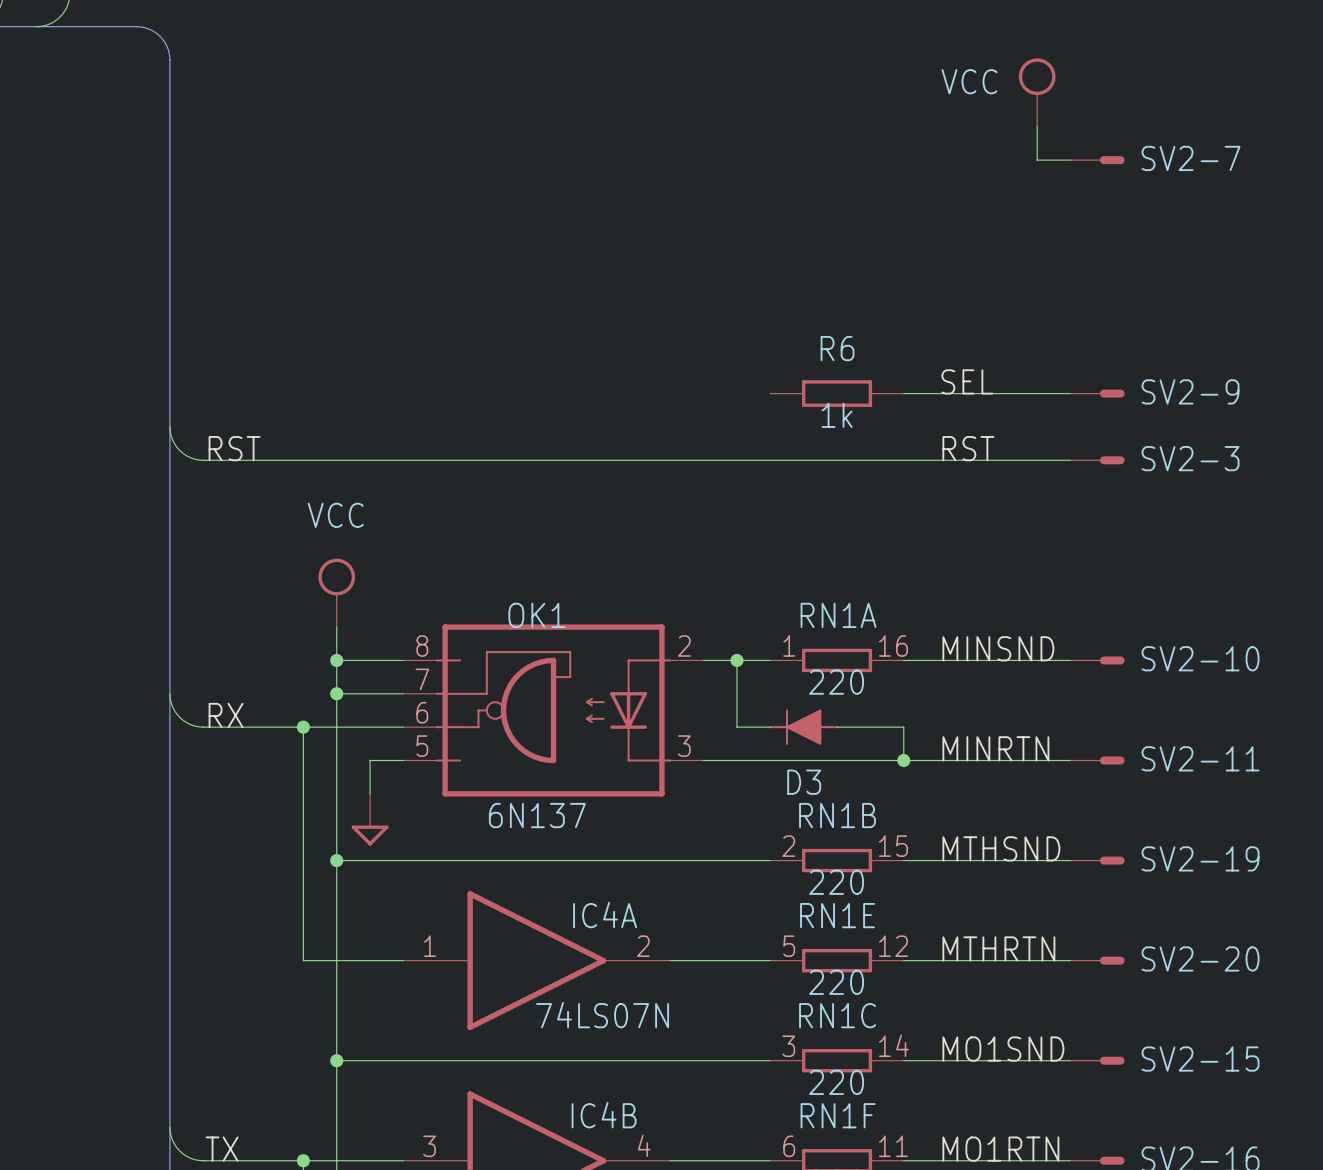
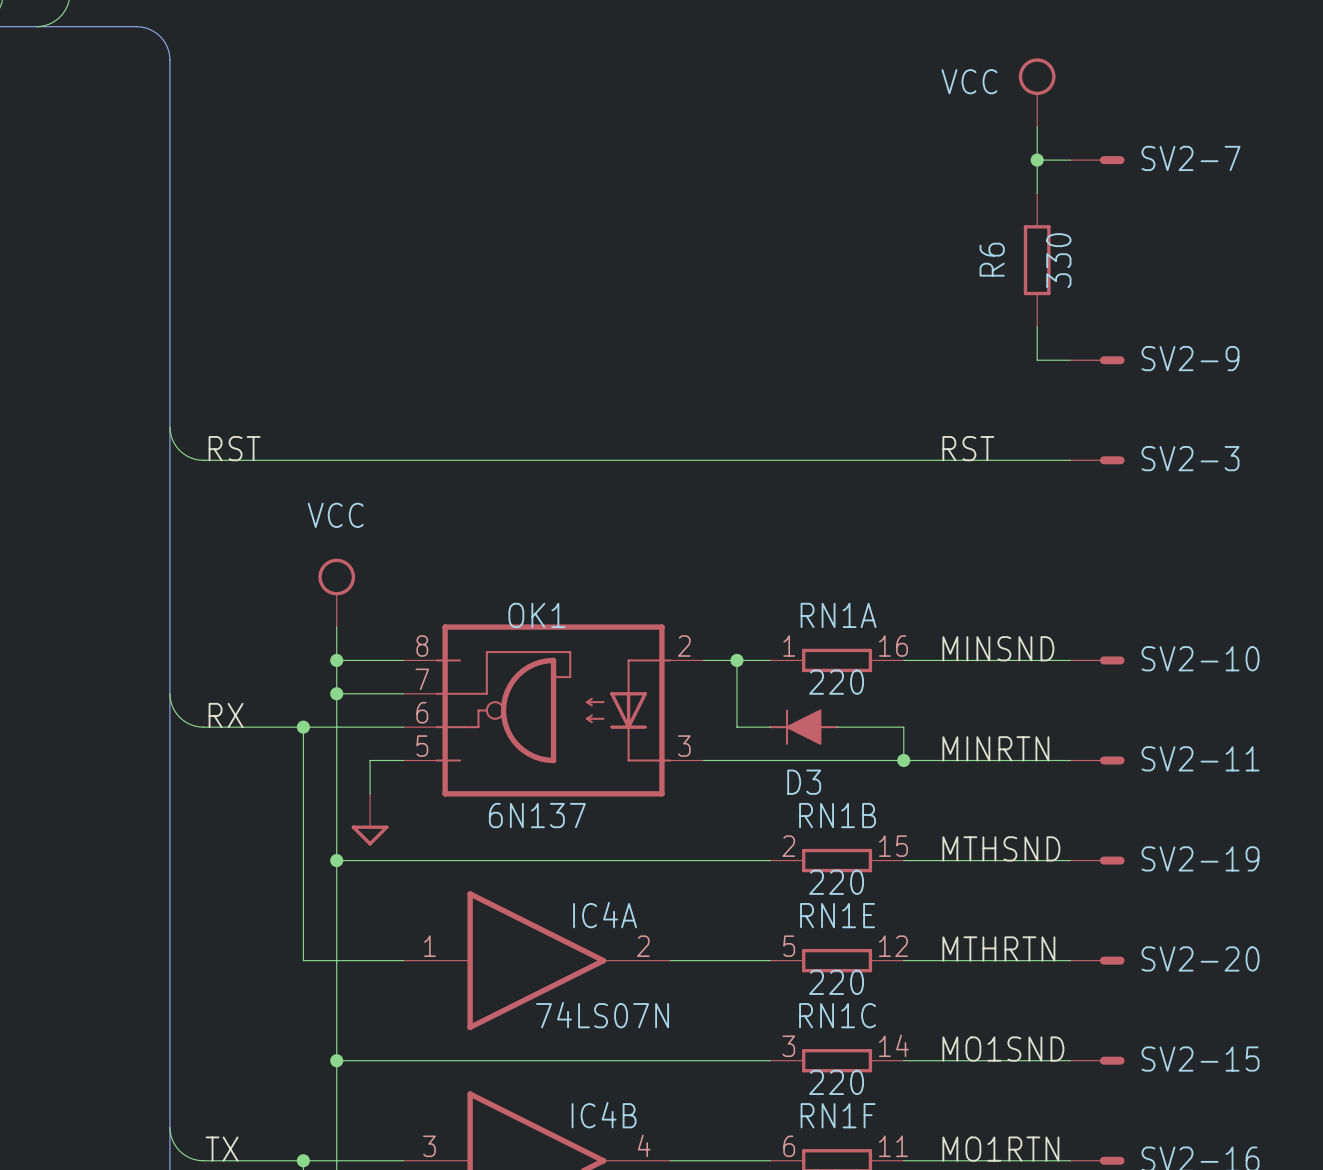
wire: none -> (1037, 160) (1037, 193)
junction: none -> (1037, 160)
wire: none -> (1037, 326) (1037, 360) (1070, 360)
R6 name position: R6 (837, 348) -> R6 (992, 259)
label: SEL (967, 381) -> none
R6 rotation: 0° (837, 393) -> 90° clockwise (1037, 260)
R6 position: (837, 393) -> (1037, 260)
wire: (903, 393) (1070, 393) -> none
SV2-9 position: (1097, 393) -> (1097, 360)
R6 value: 1k (837, 415) -> 330 (1058, 260)

